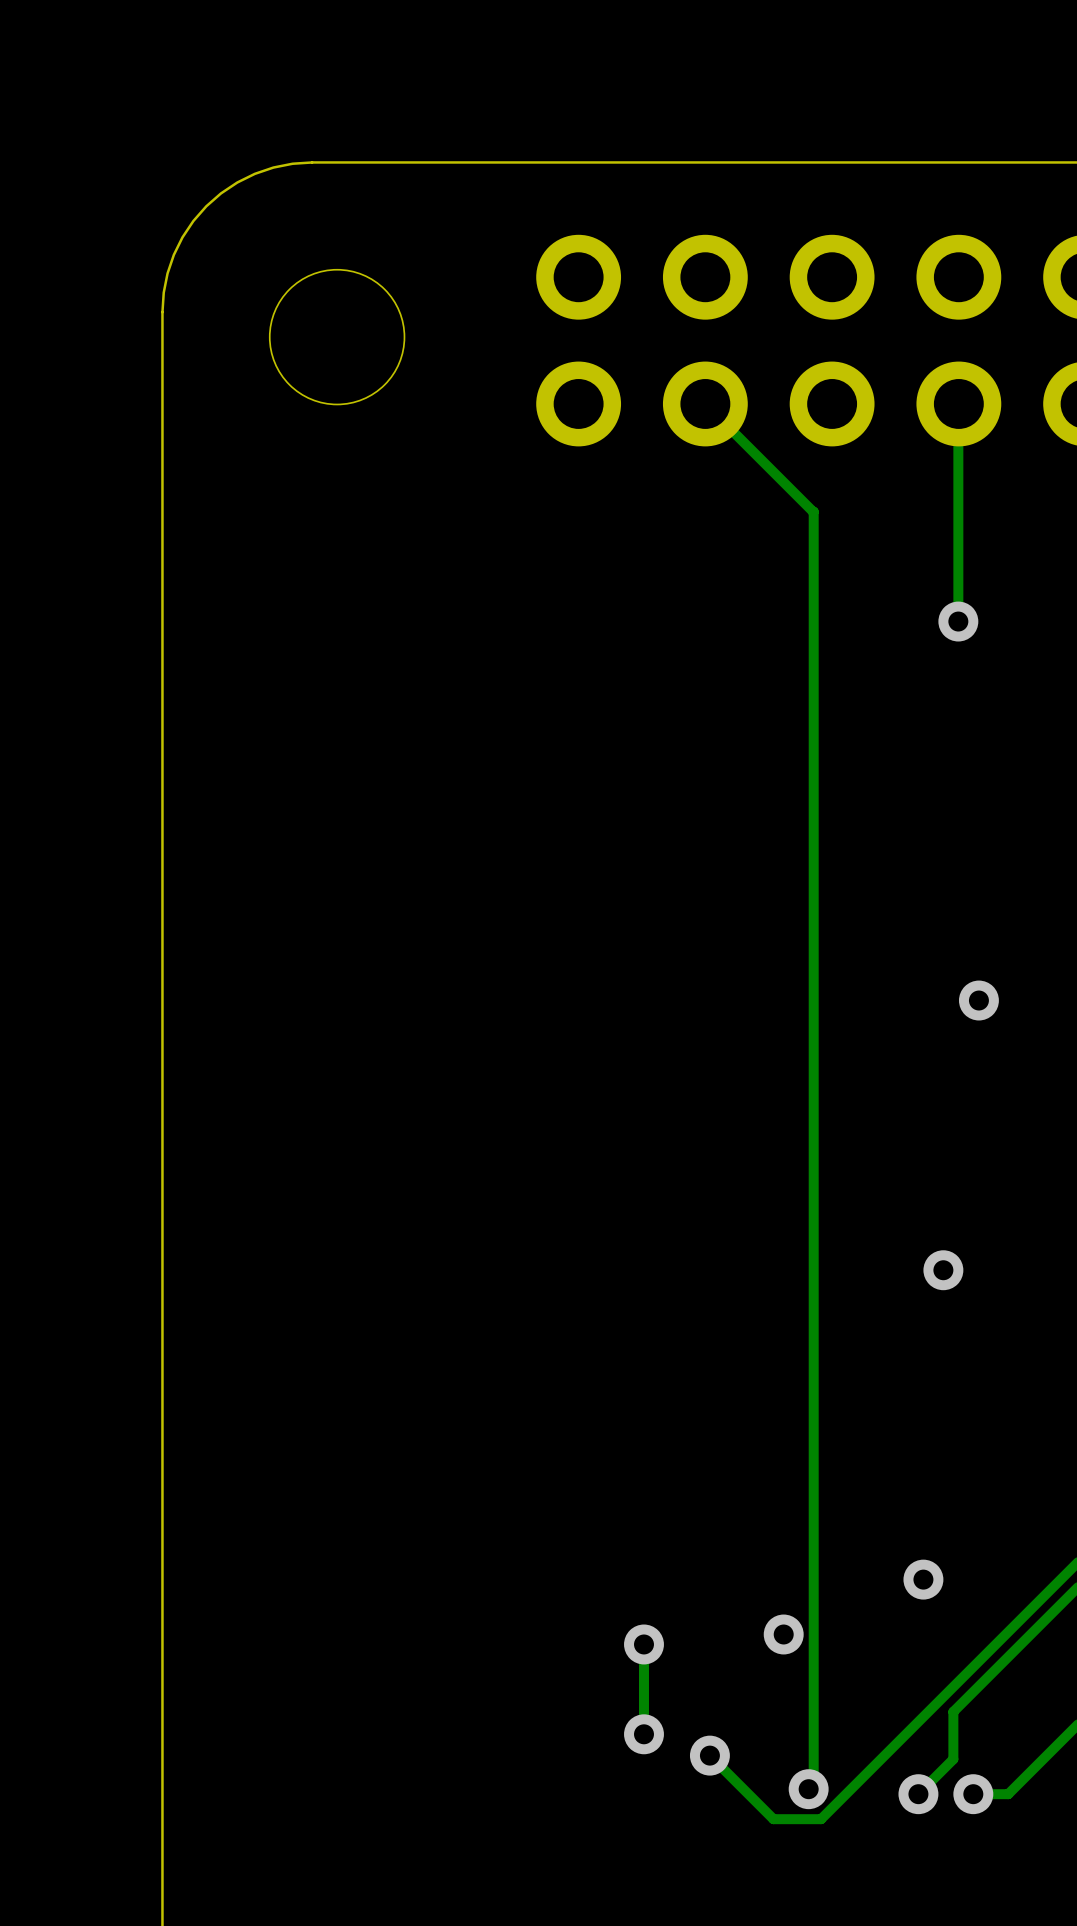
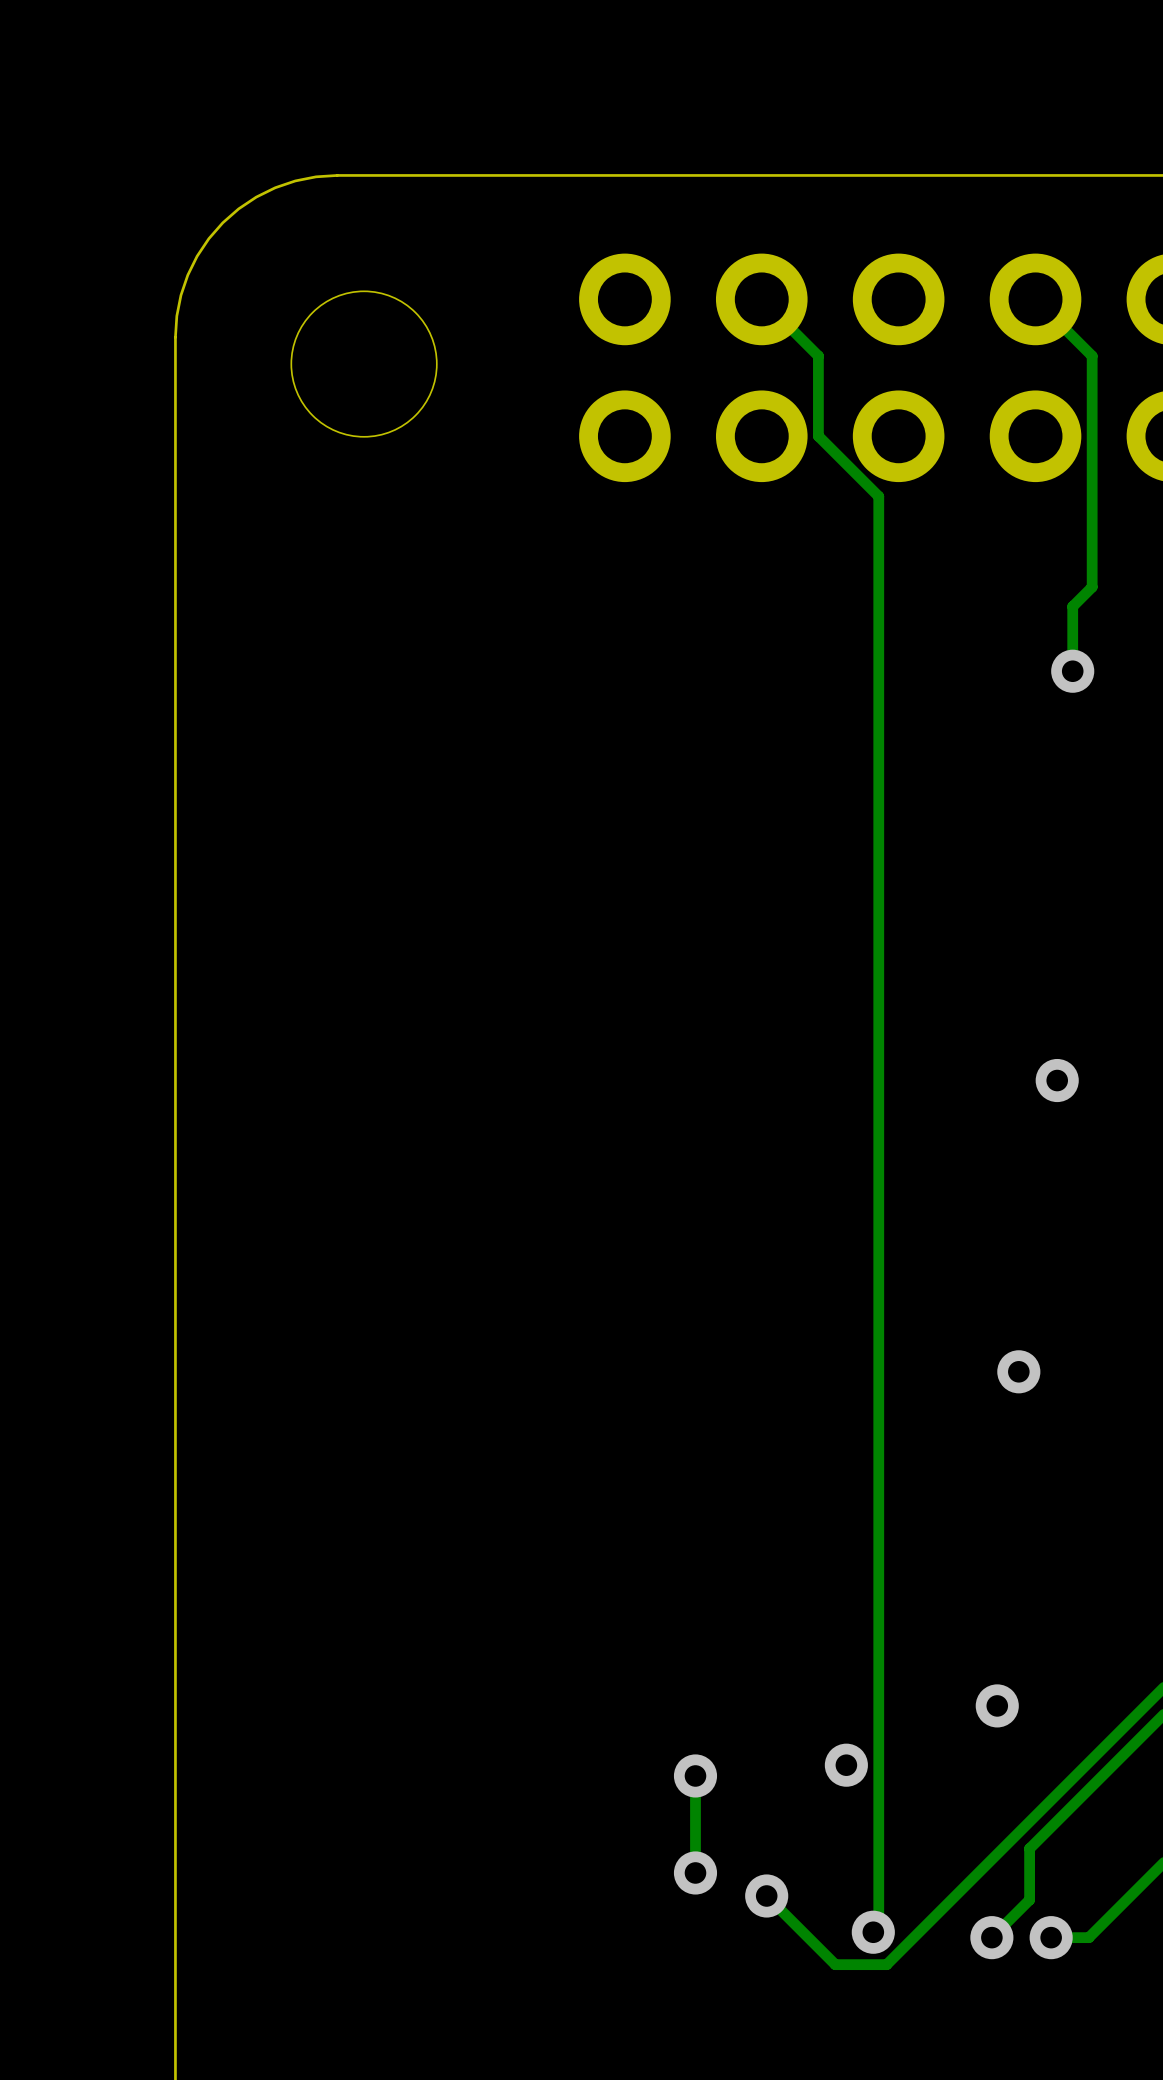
track: none -> (1035, 299) (1092, 356) (1092, 587) (1072, 606) (1072, 671)
track: (705, 403) (813, 511) -> (761, 299) (818, 356) (818, 436) (878, 496) (878, 552)
track: (958, 404) (958, 621) -> none
via position: (958, 621) -> (1072, 671)

